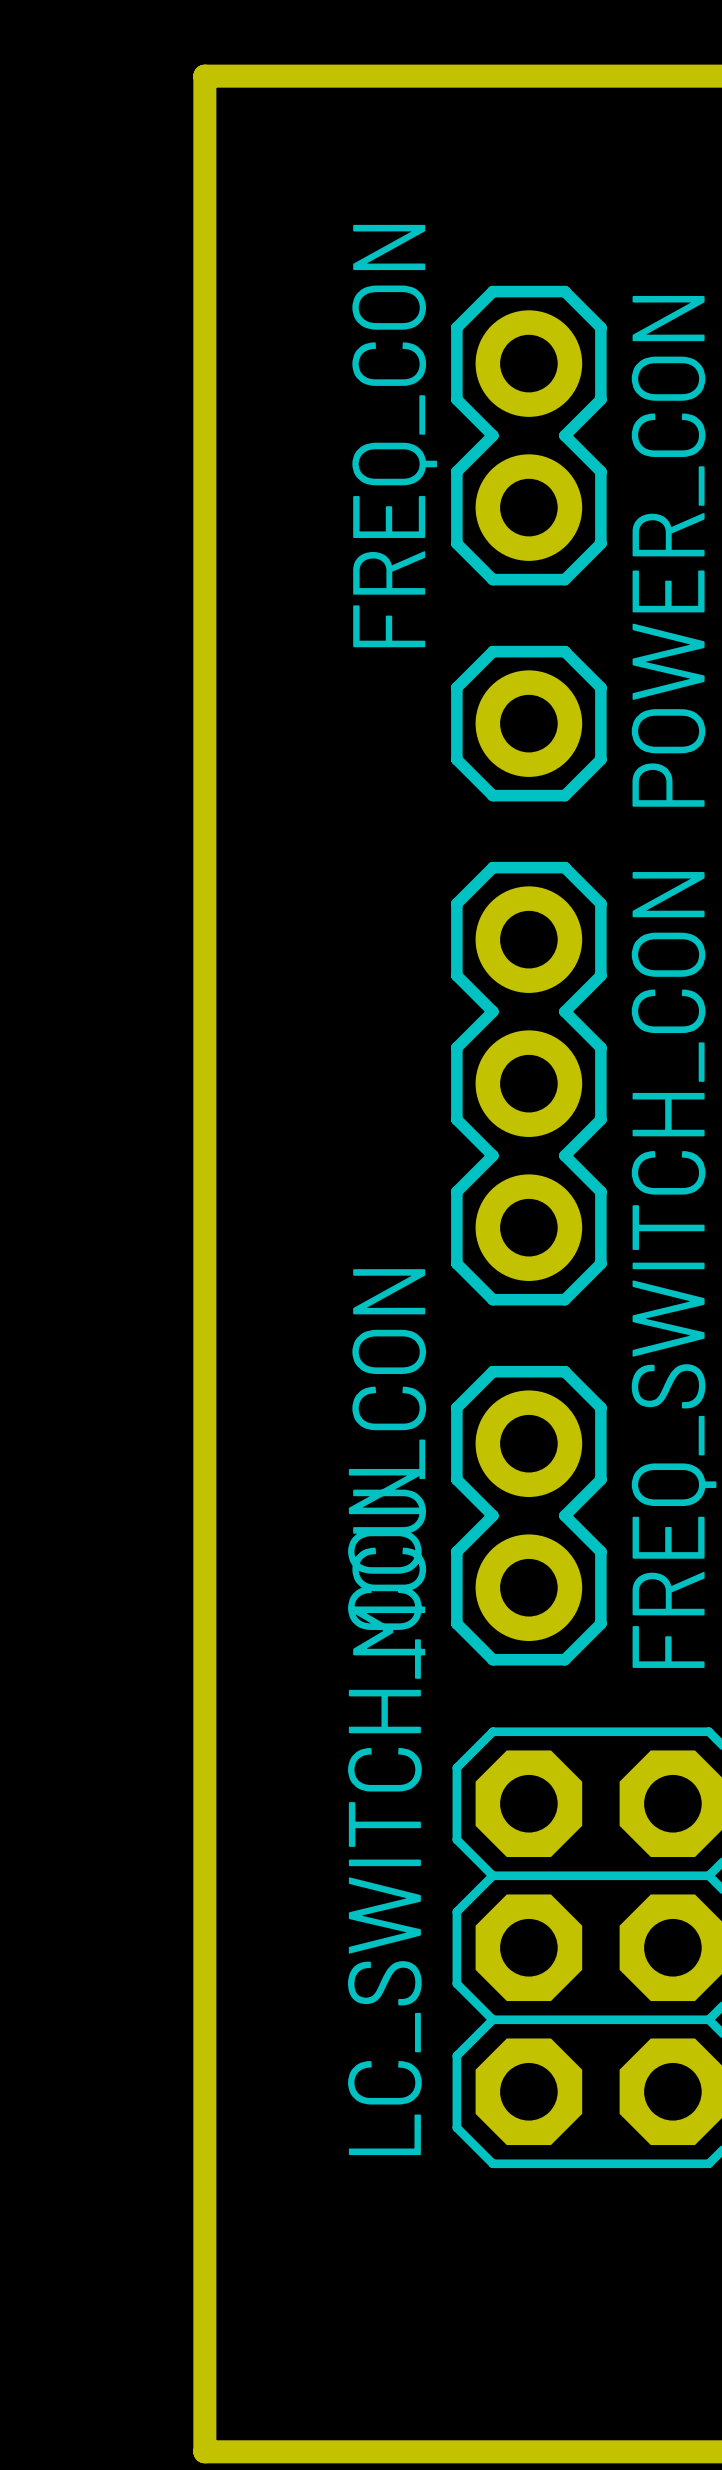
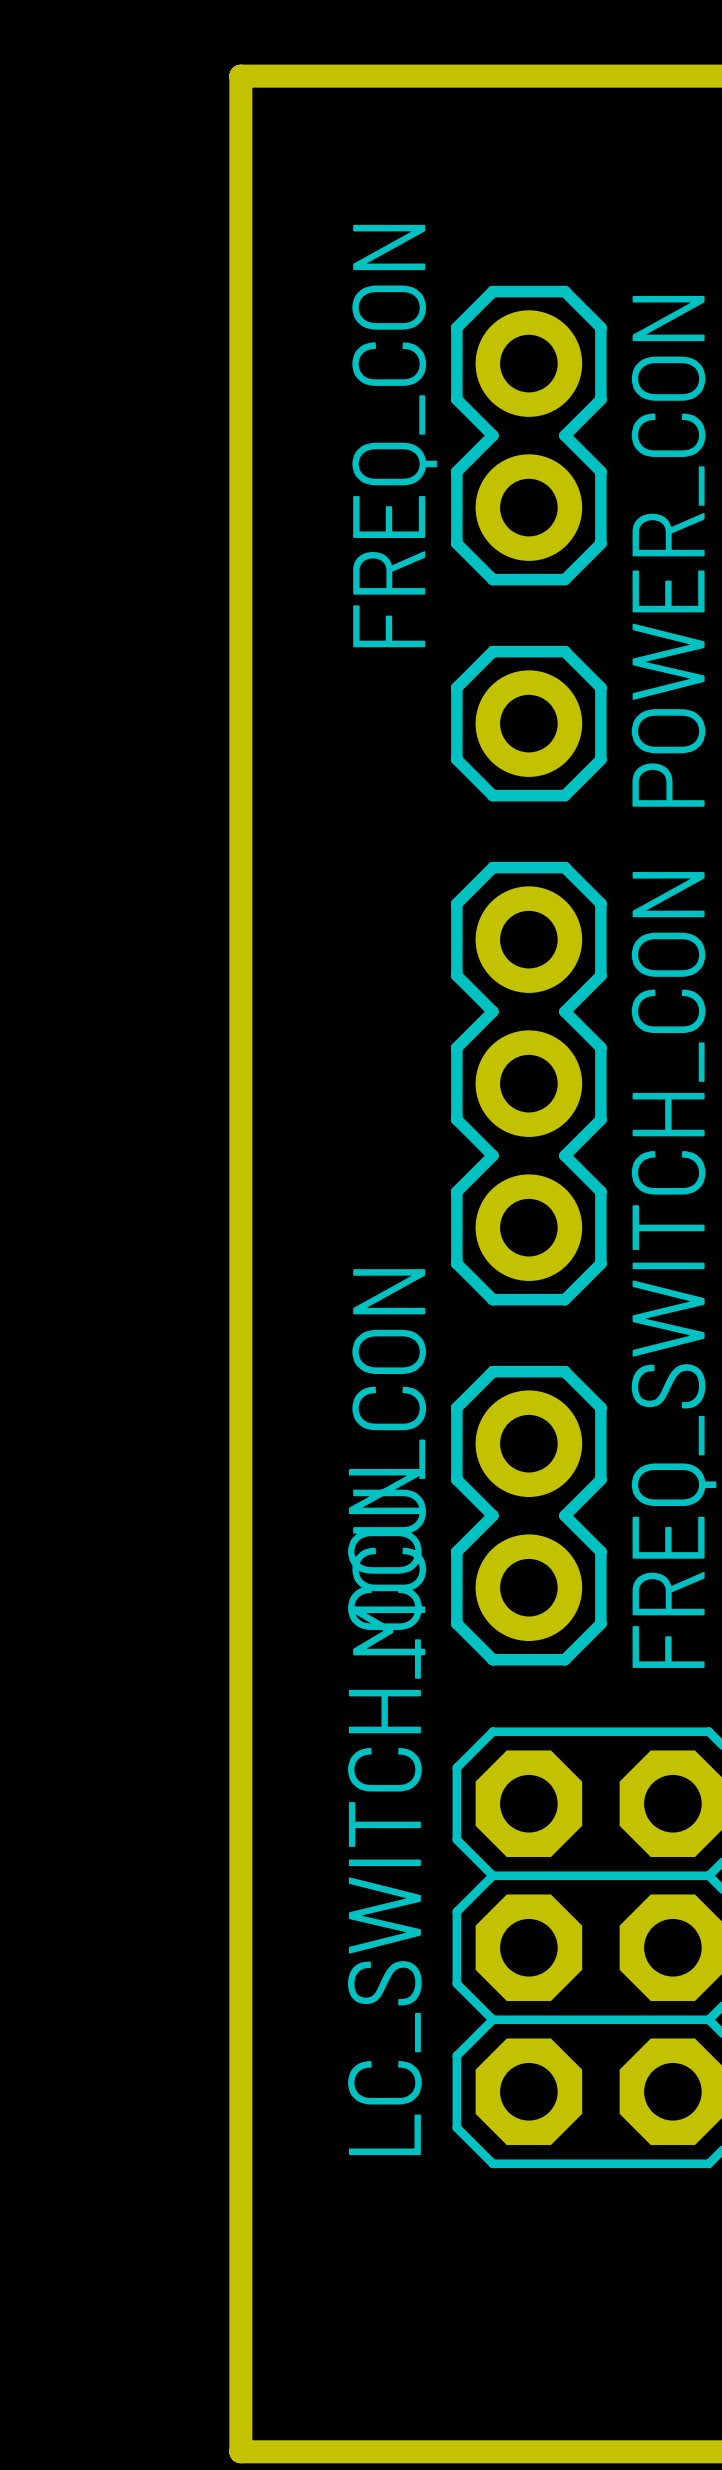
board edge: (240, 76) (204, 76) (204, 2451) (240, 2451) -> (240, 76) (240, 2451)

